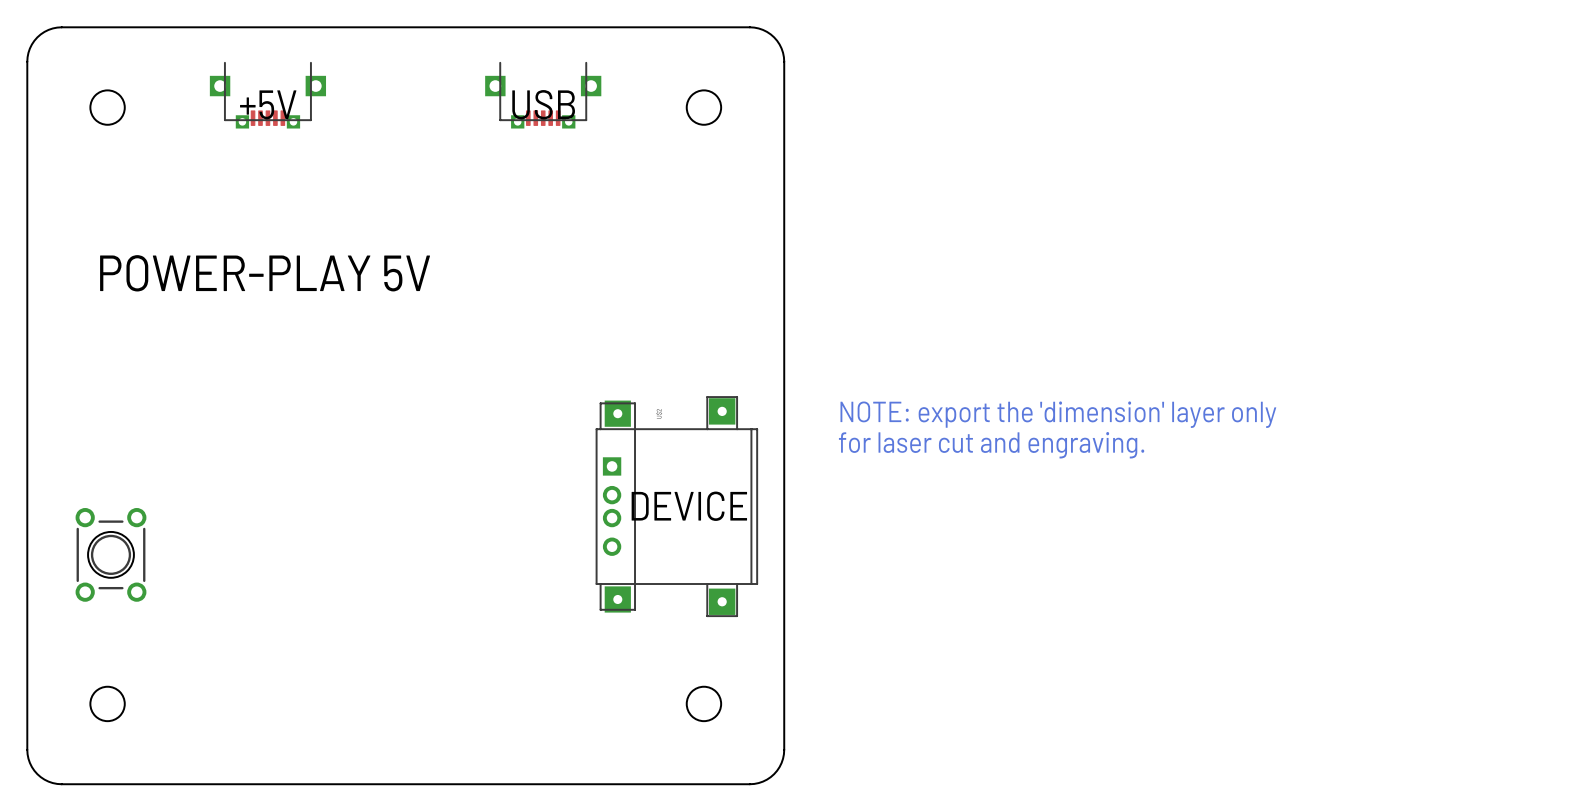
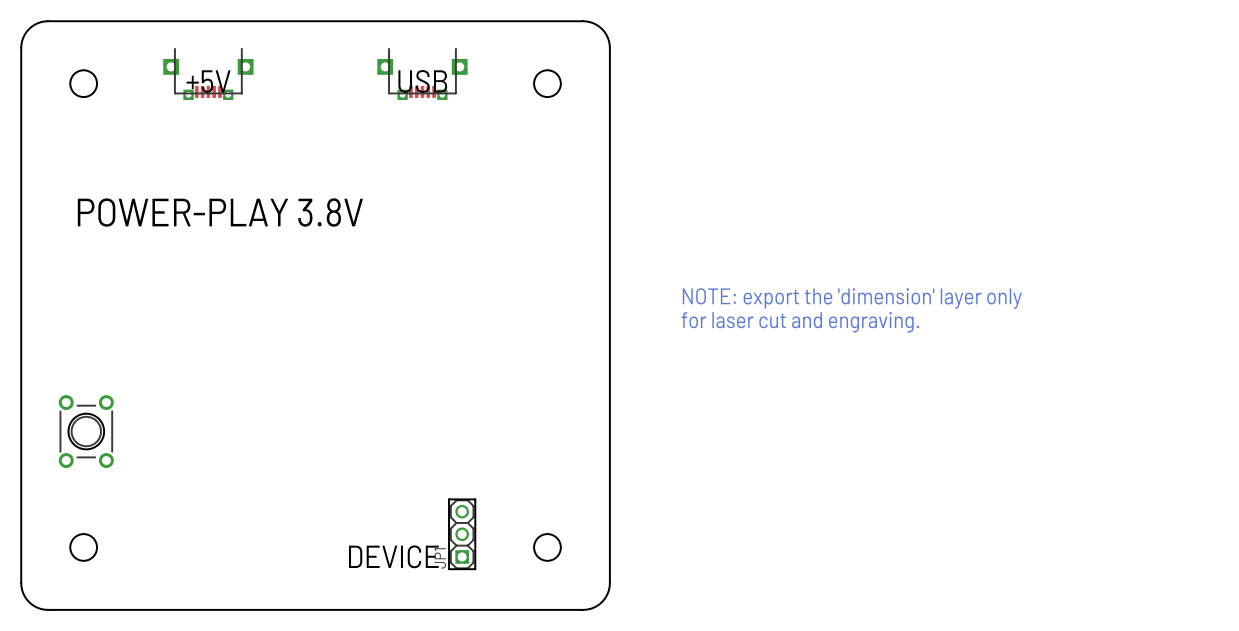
text: POWER-PLAY 5V (265, 273) -> POWER-PLAY 3.8V (220, 212)
text position: NOTE: export the 'dimension' layer only (1058, 414) -> NOTE: export the 'dimension' layer only (852, 298)
text position: for laser cut and engraving. (991, 445) -> for laser cut and engraving. (800, 322)
part: (676, 506) -> none
text position: DEVICE (689, 506) -> DEVICE (393, 556)
board edge: none -> (449, 499) (449, 569) (475, 569) (475, 499) (449, 499)
JP1: none -> (462, 534)

